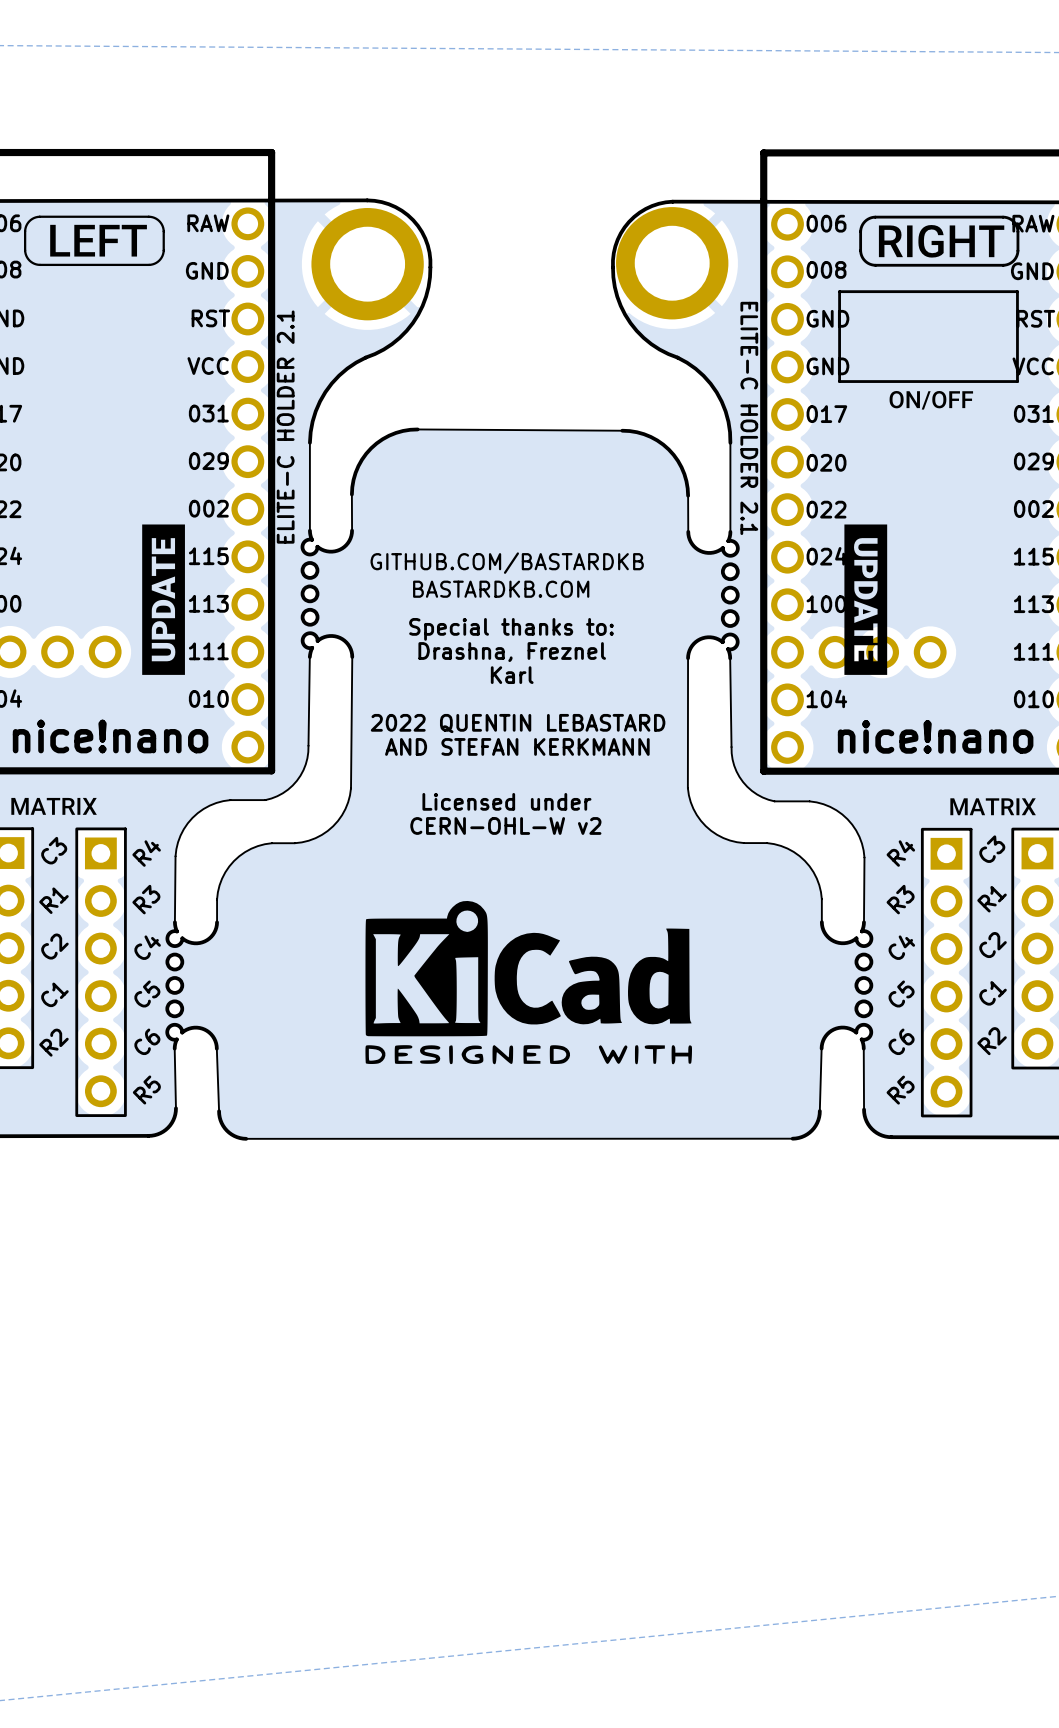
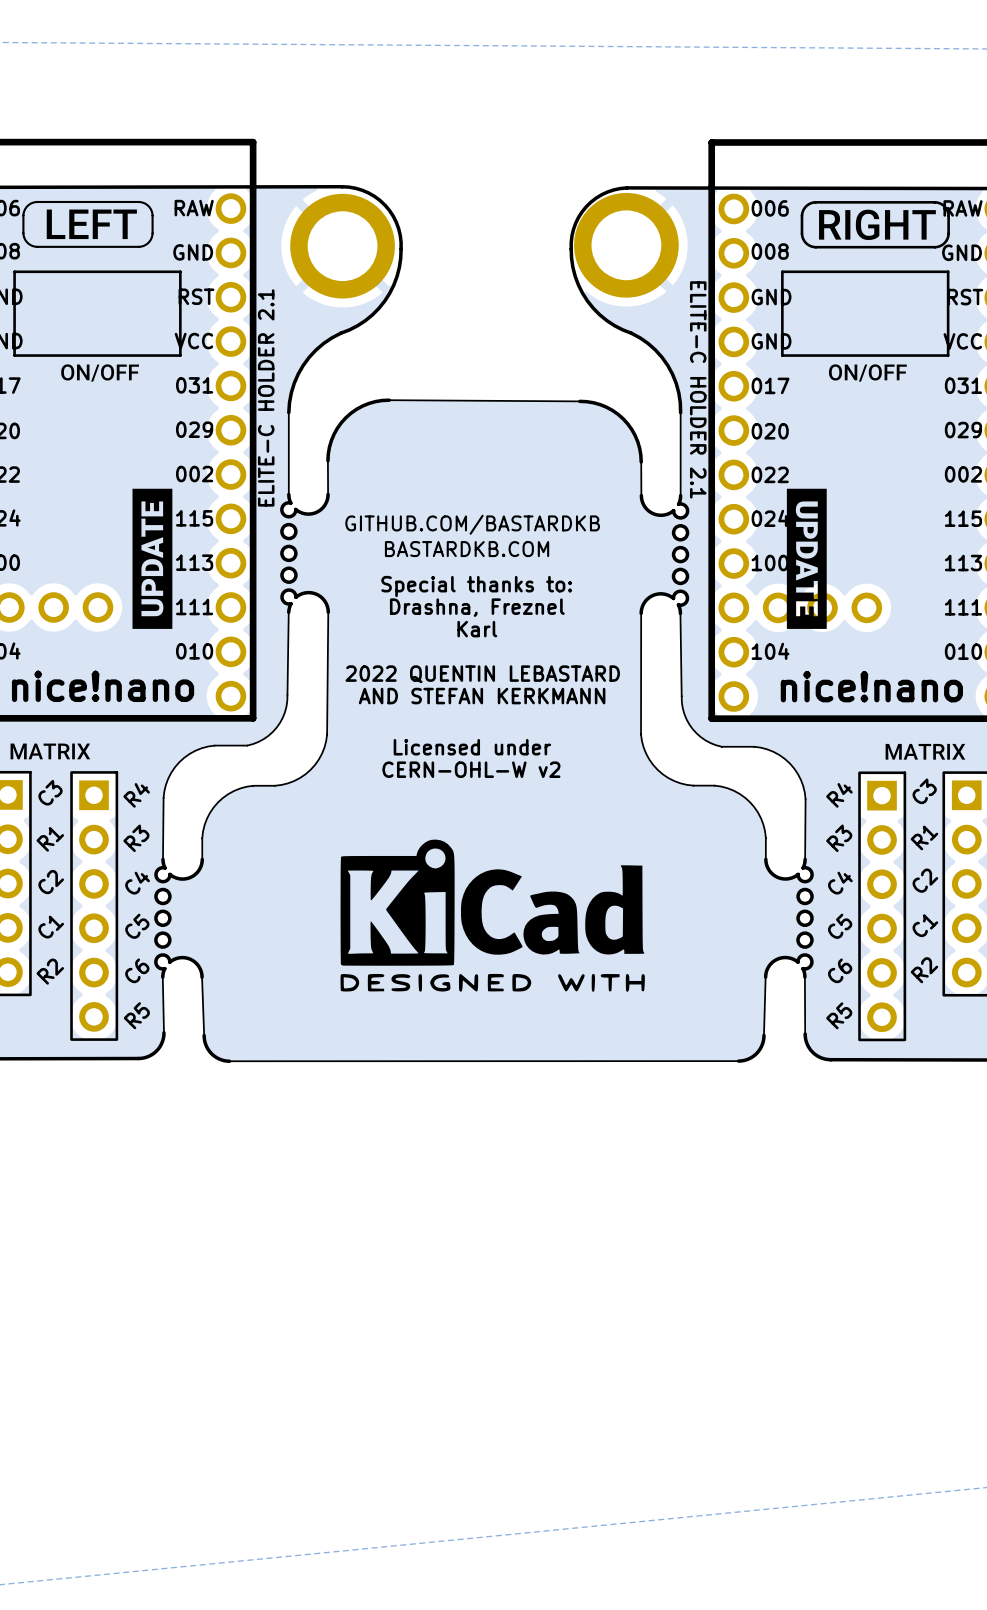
line: none -> (180, 271) (14, 271) (14, 355) (180, 355) (180, 271)
drawing: none -> [61, 364, 139, 382]

